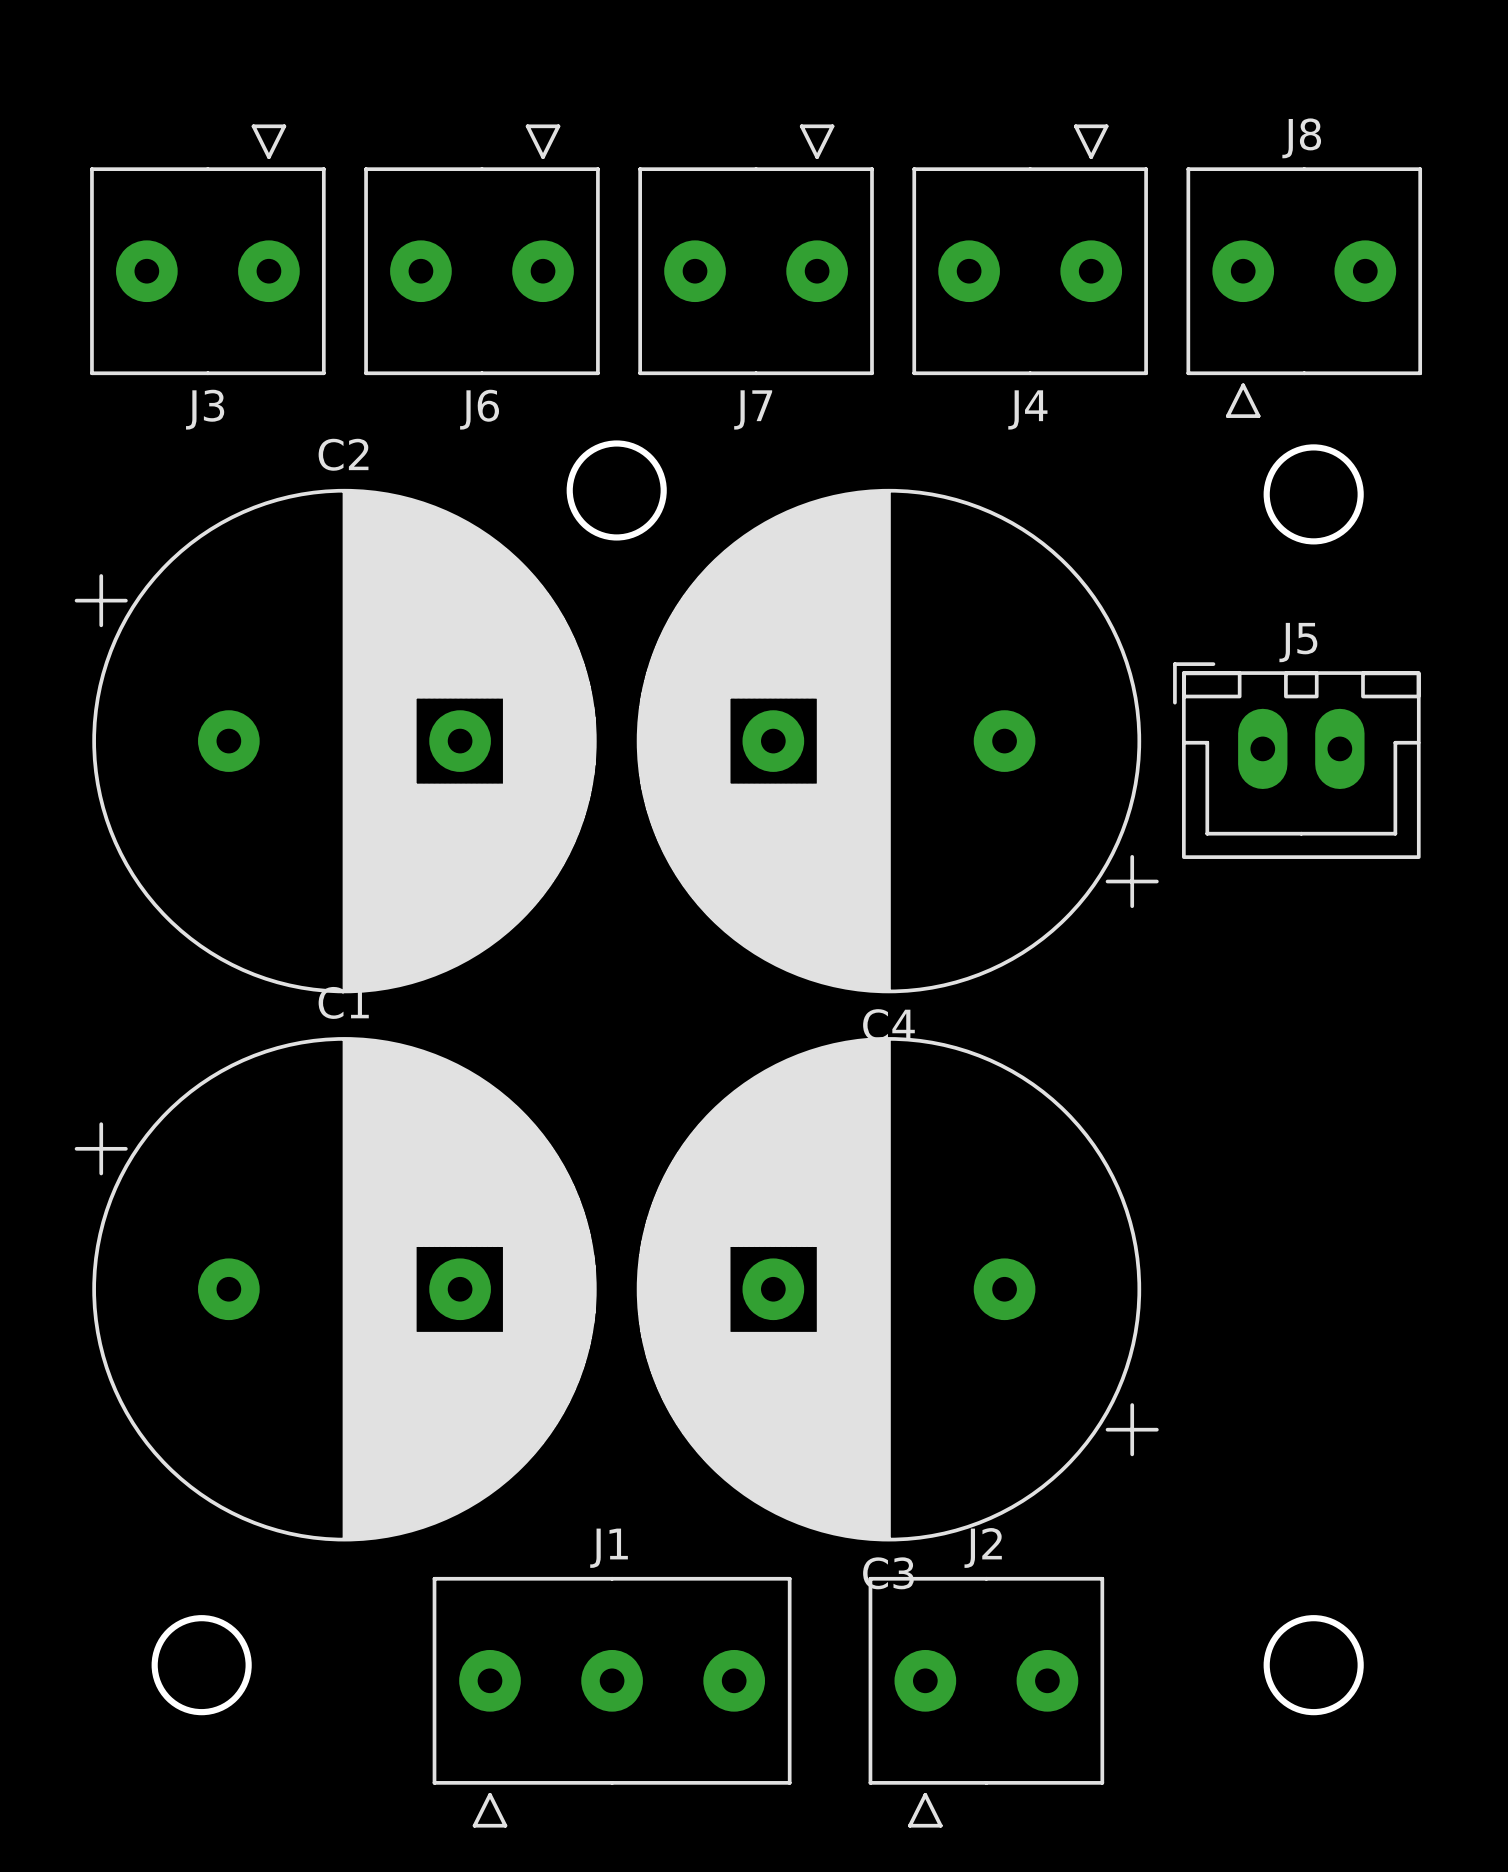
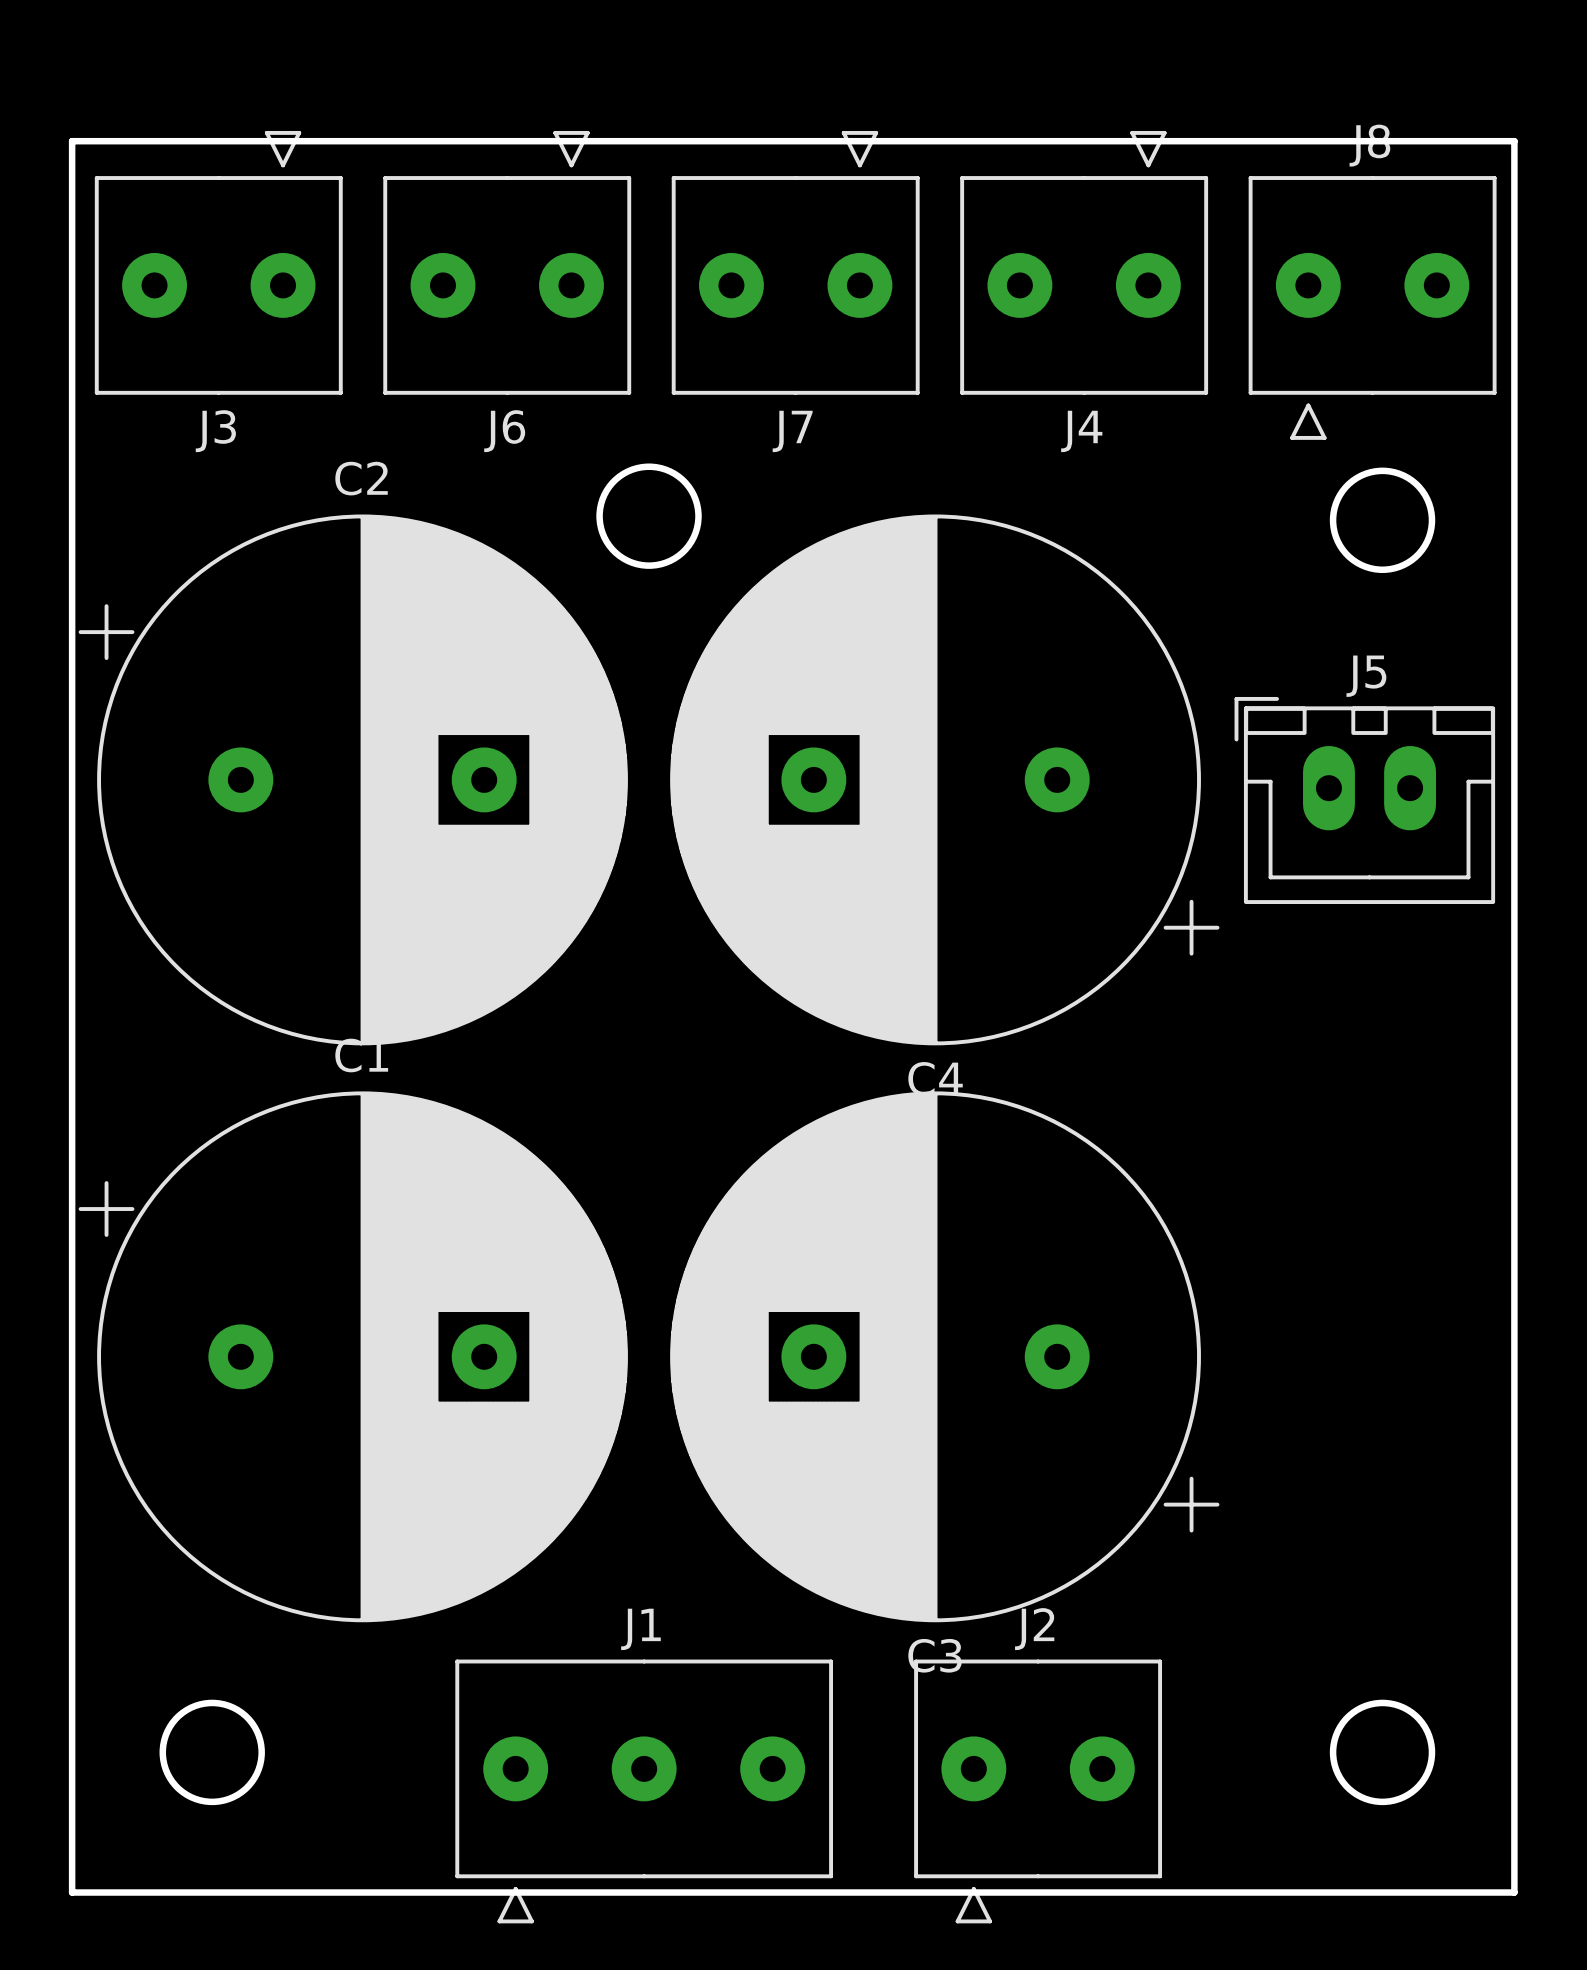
board edge: none -> (72, 141) (1514, 141) (1514, 1892) (72, 1892) (72, 141)

